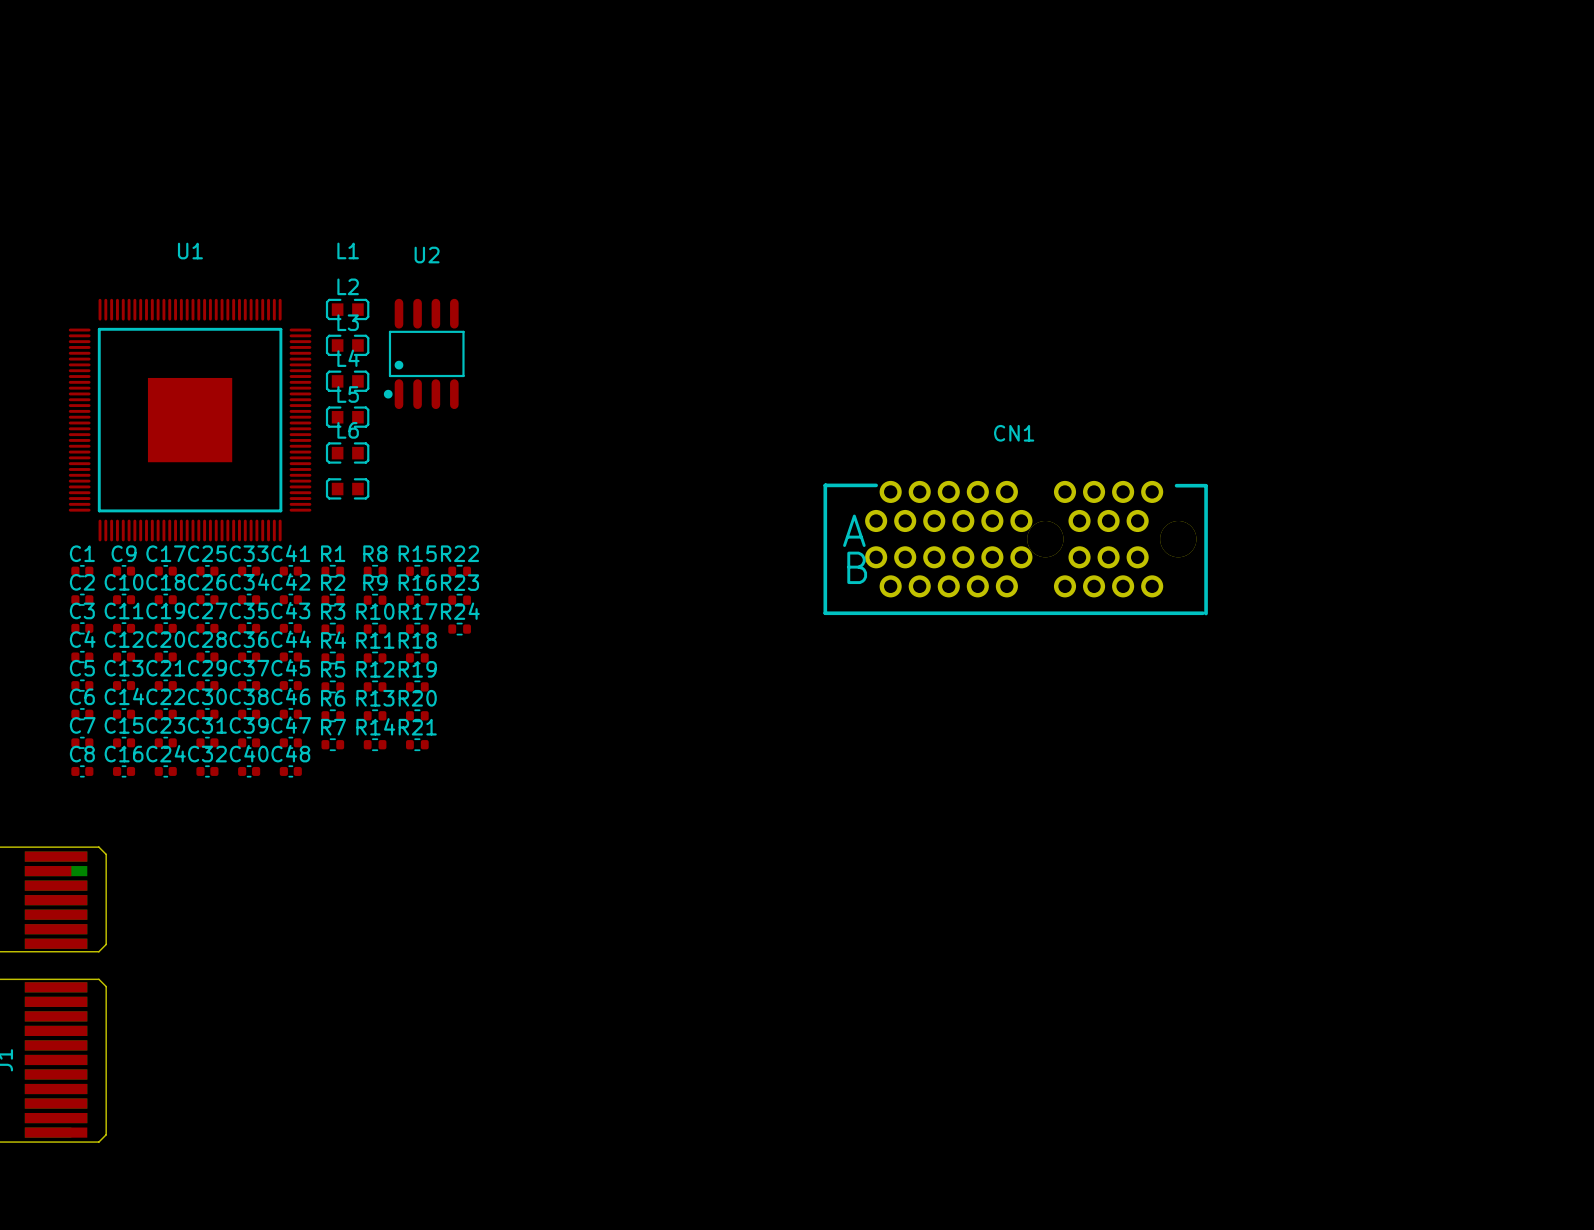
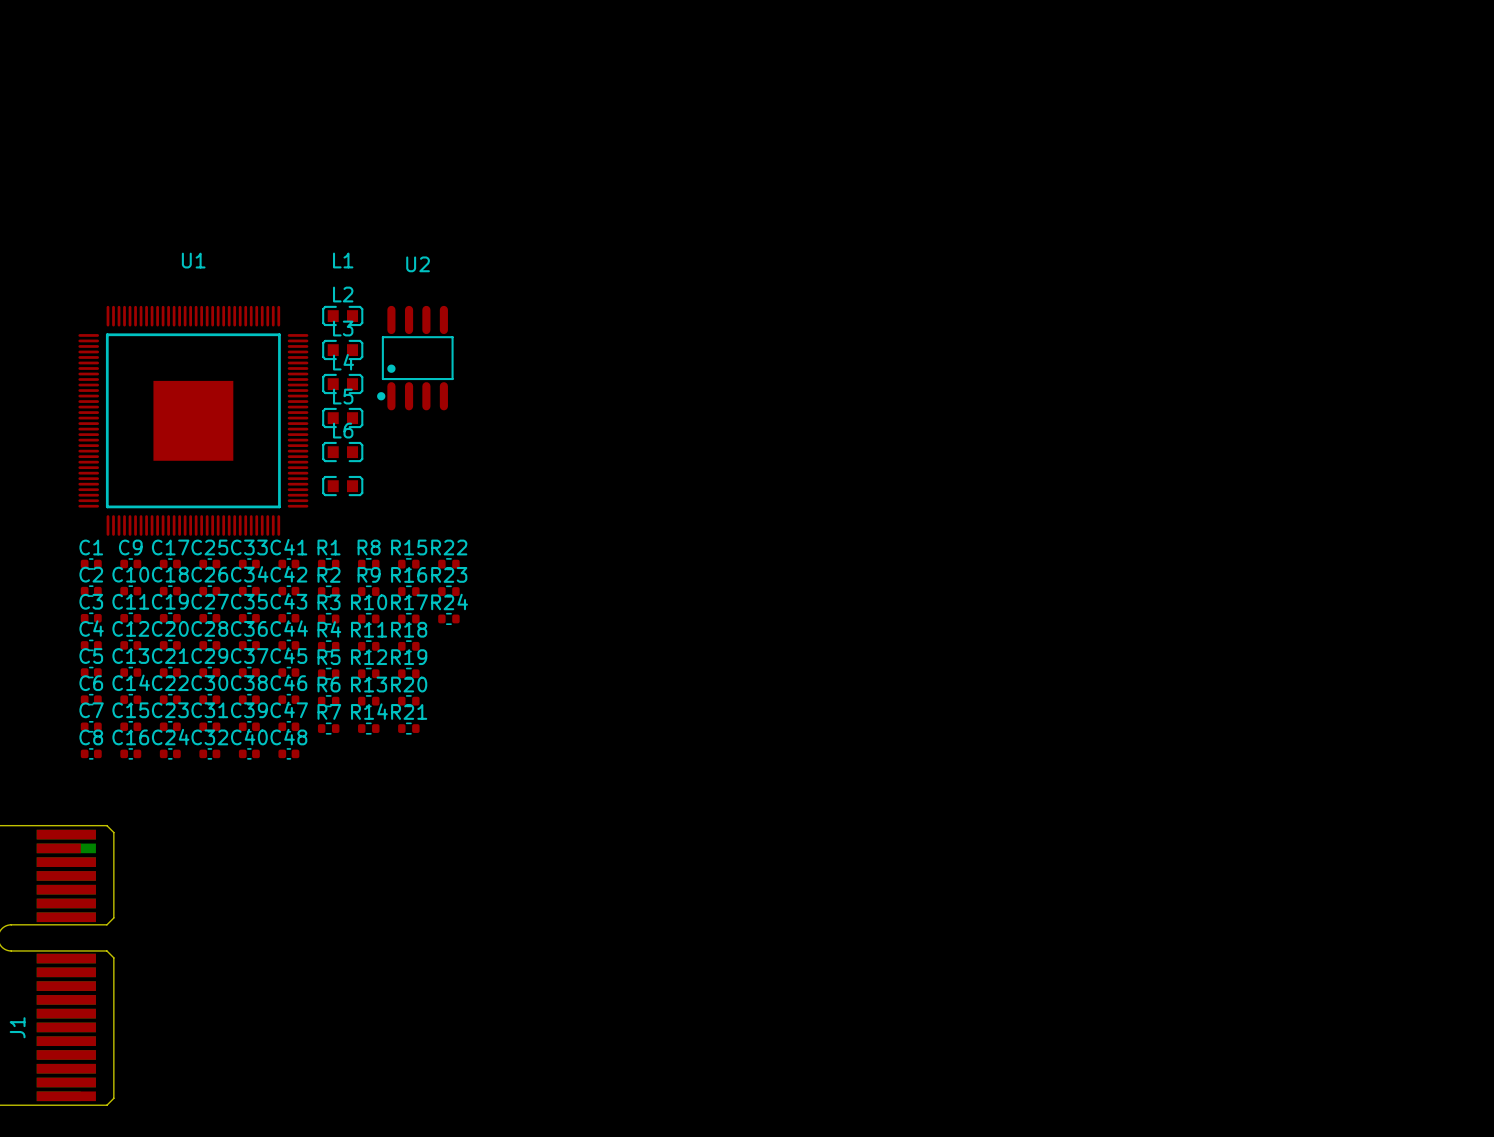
CN1: (1015, 548) -> none

